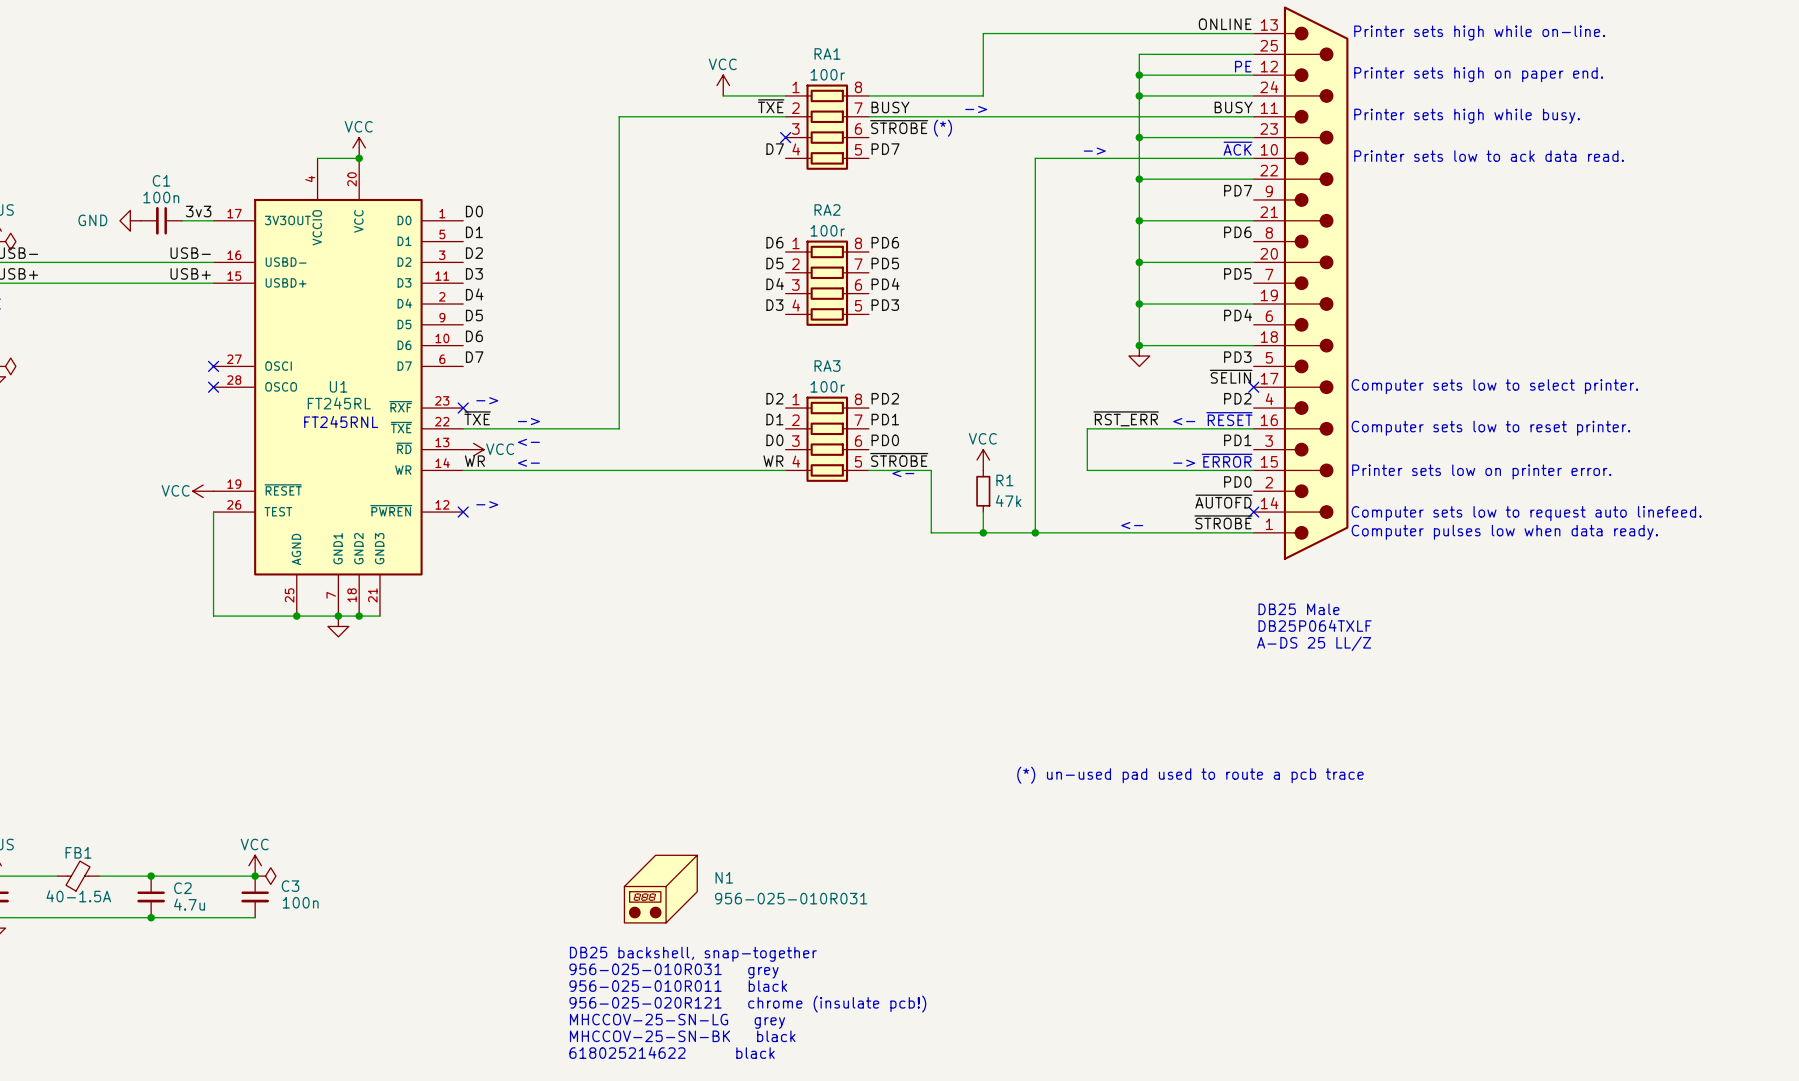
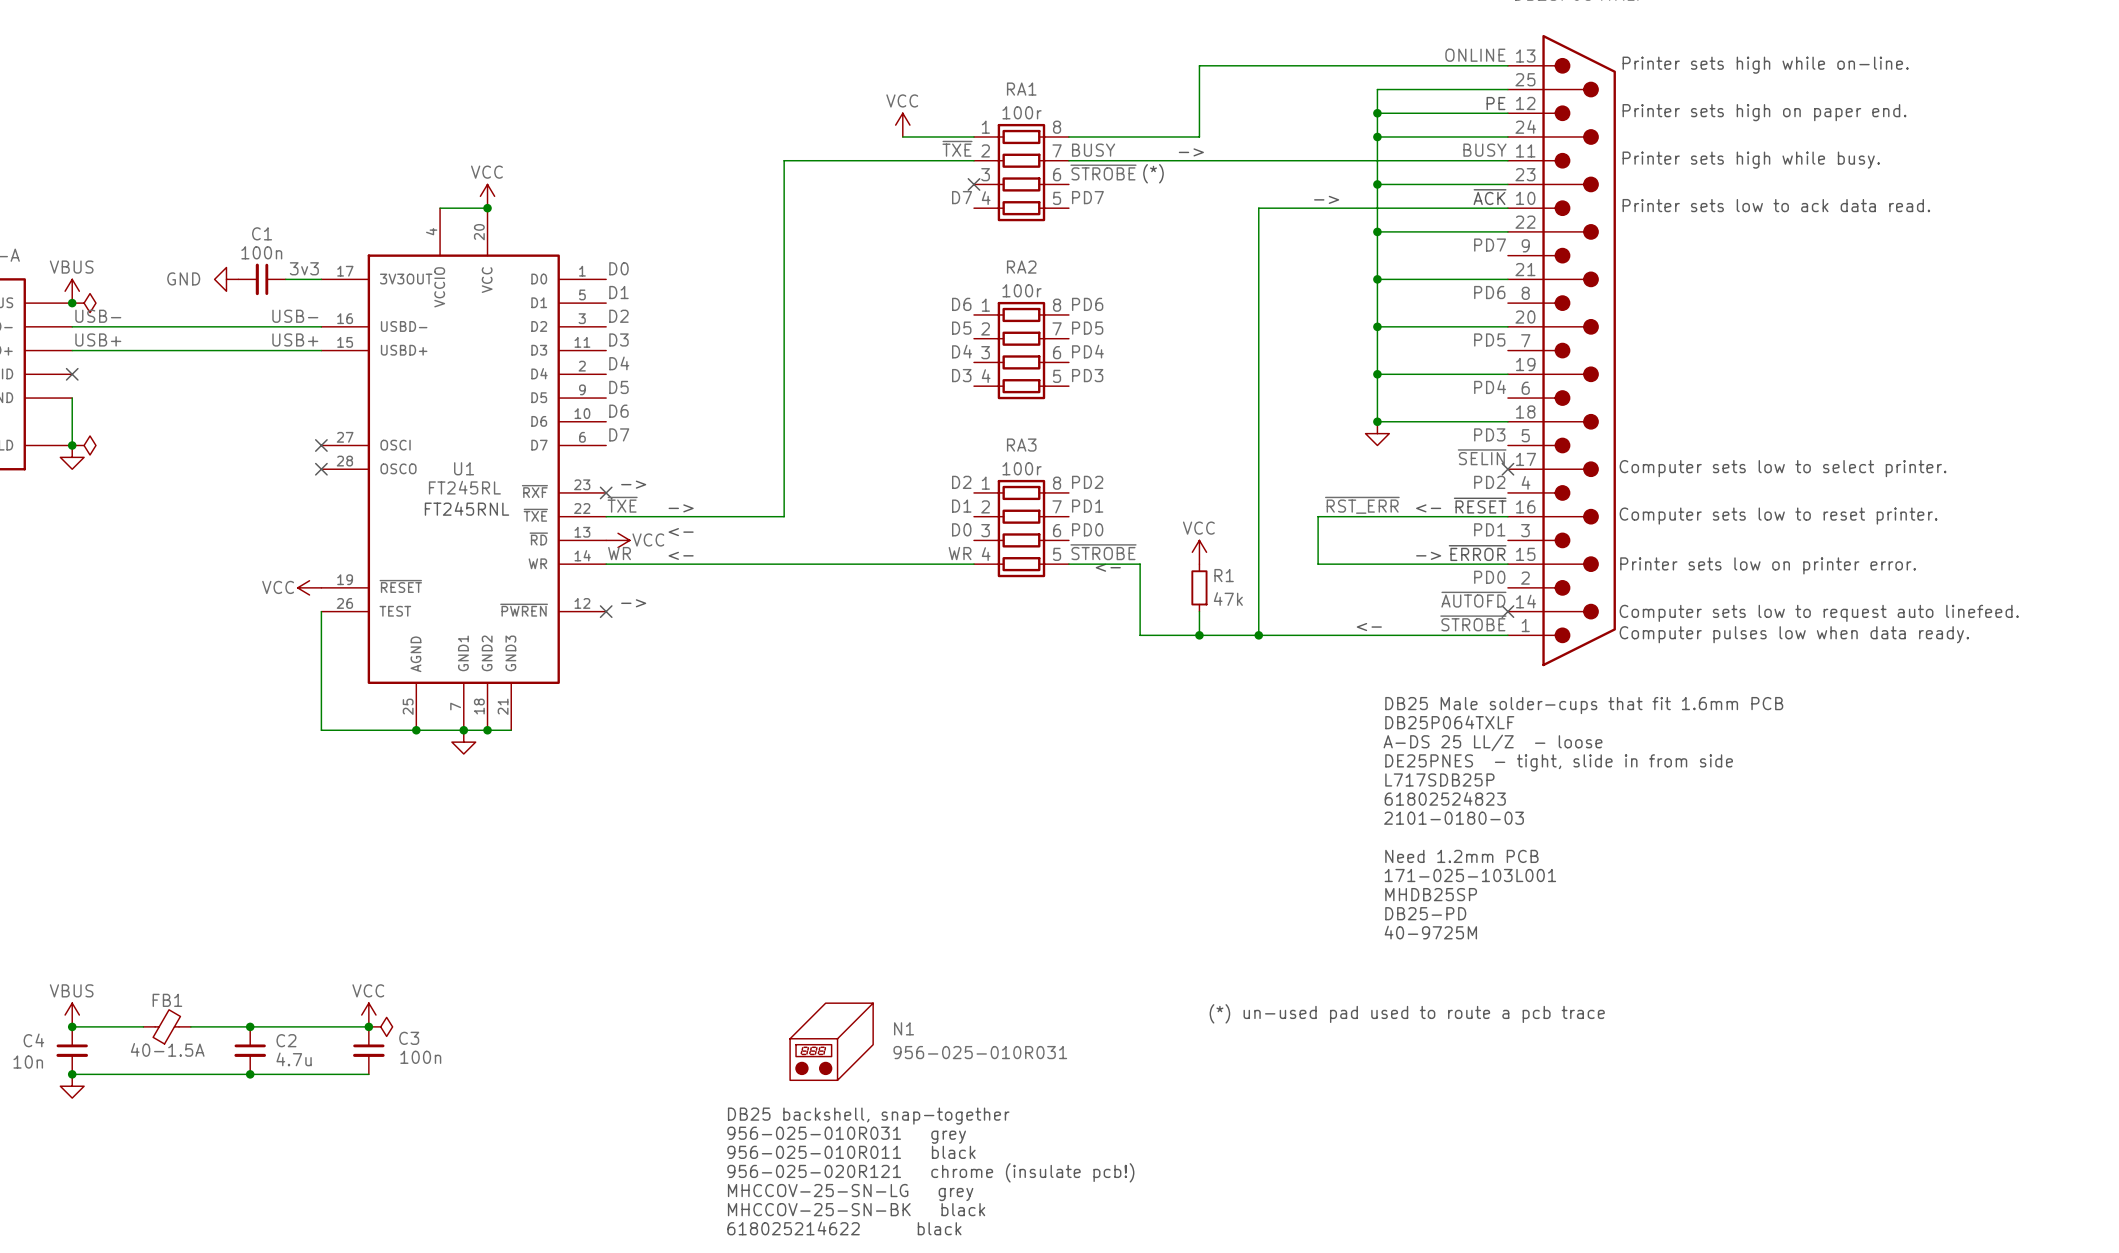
text: none -> DB25 Male solder-cups that fit 1.6mm PCB (1584, 705)
text: DB25 Male (1299, 609) -> none
text position: DB25P064TXLF (1315, 625) -> DB25P064TXLF (1449, 722)
text: A-DS 25 LL/Z (1314, 643) -> A-DS 25 LL/Z - loose (1493, 742)
text: none -> DE25PNES - tight, slide in from side (1559, 762)
text: none -> L717SDB25P (1439, 779)
text: none -> 61802524823 (1445, 798)
text: none -> 2101-0180-03 (1454, 818)
text: none -> Need 1.2mm PCB (1461, 856)
text: none -> 171-025-103L001 (1470, 875)
text: none -> MHDB25SP (1431, 894)
text position: (*) un-used pad used to route a pcb trace (1190, 775) -> (*) un-used pad used to route a pcb trace (1407, 1013)
text: none -> DB25-PD (1425, 913)
text: none -> 40-9725M (1430, 932)

